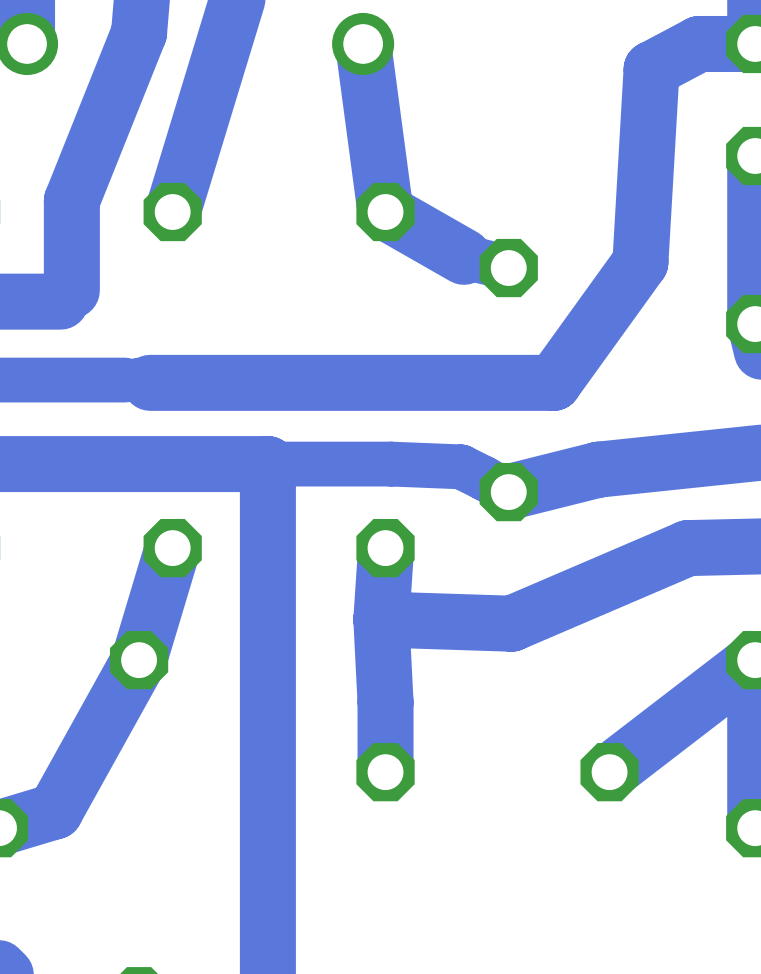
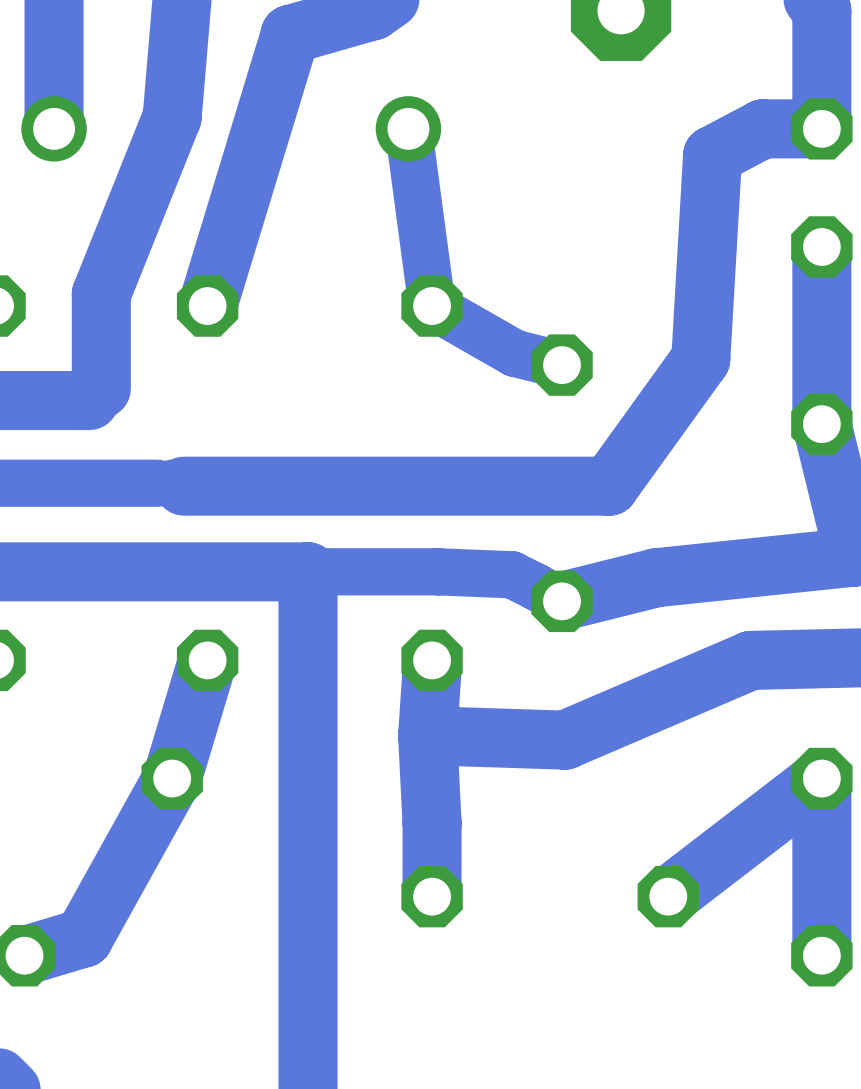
track width: thick (363, 43) (385, 212) (463, 256) -> thin (408, 128) (432, 306) (514, 353)

